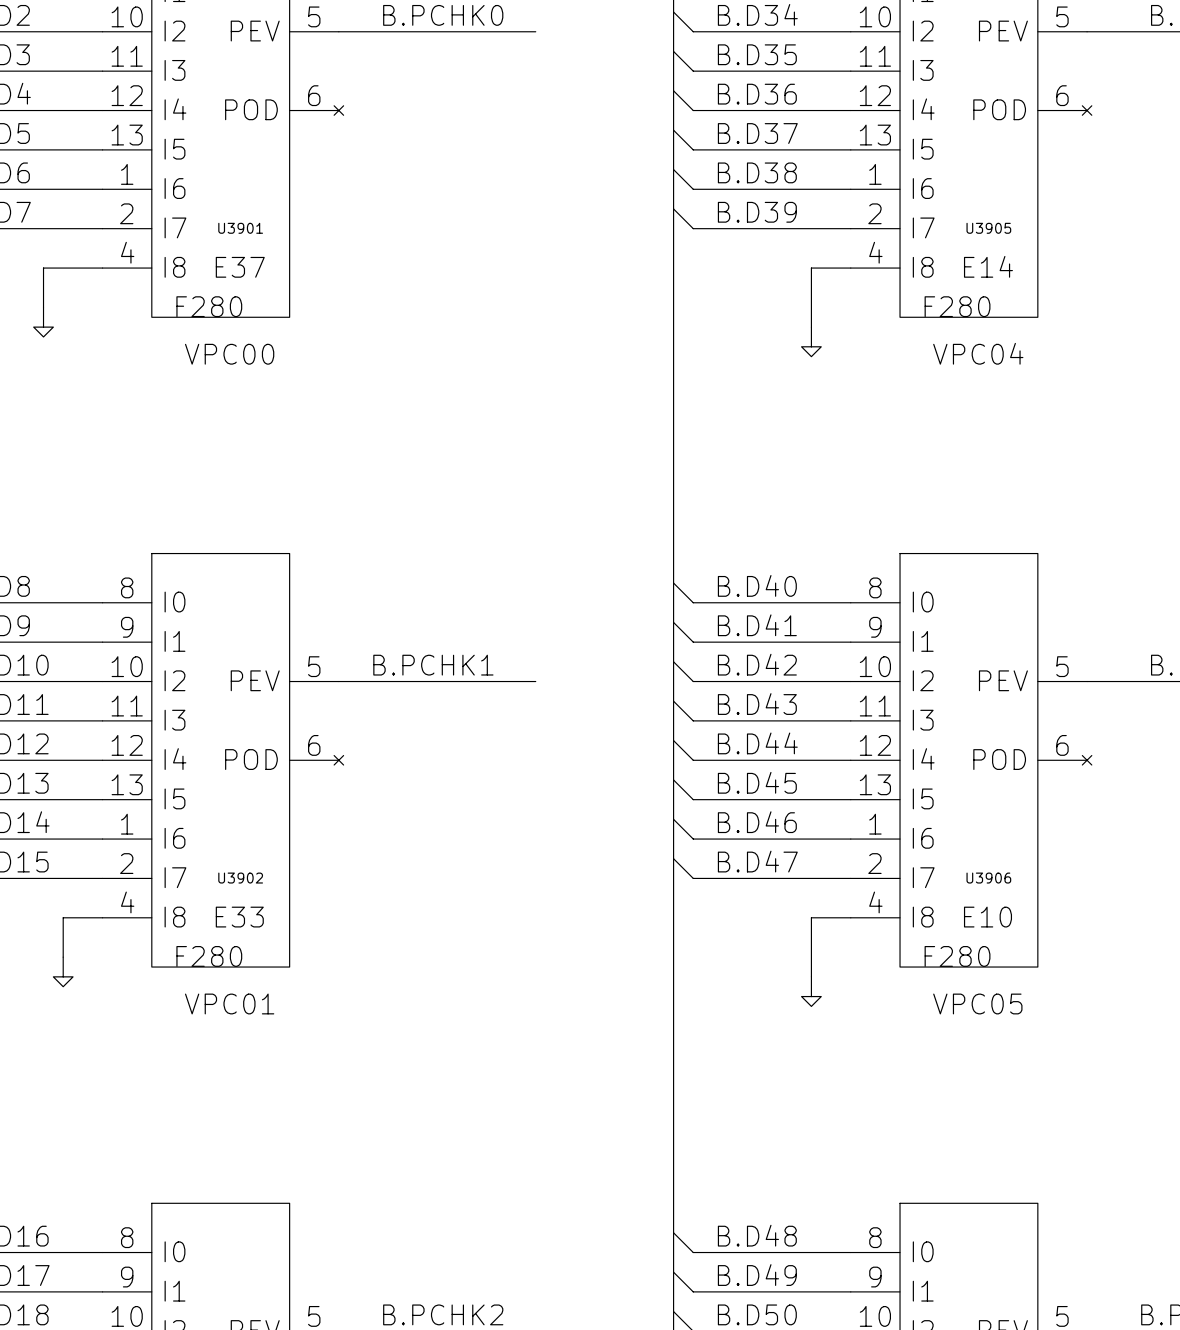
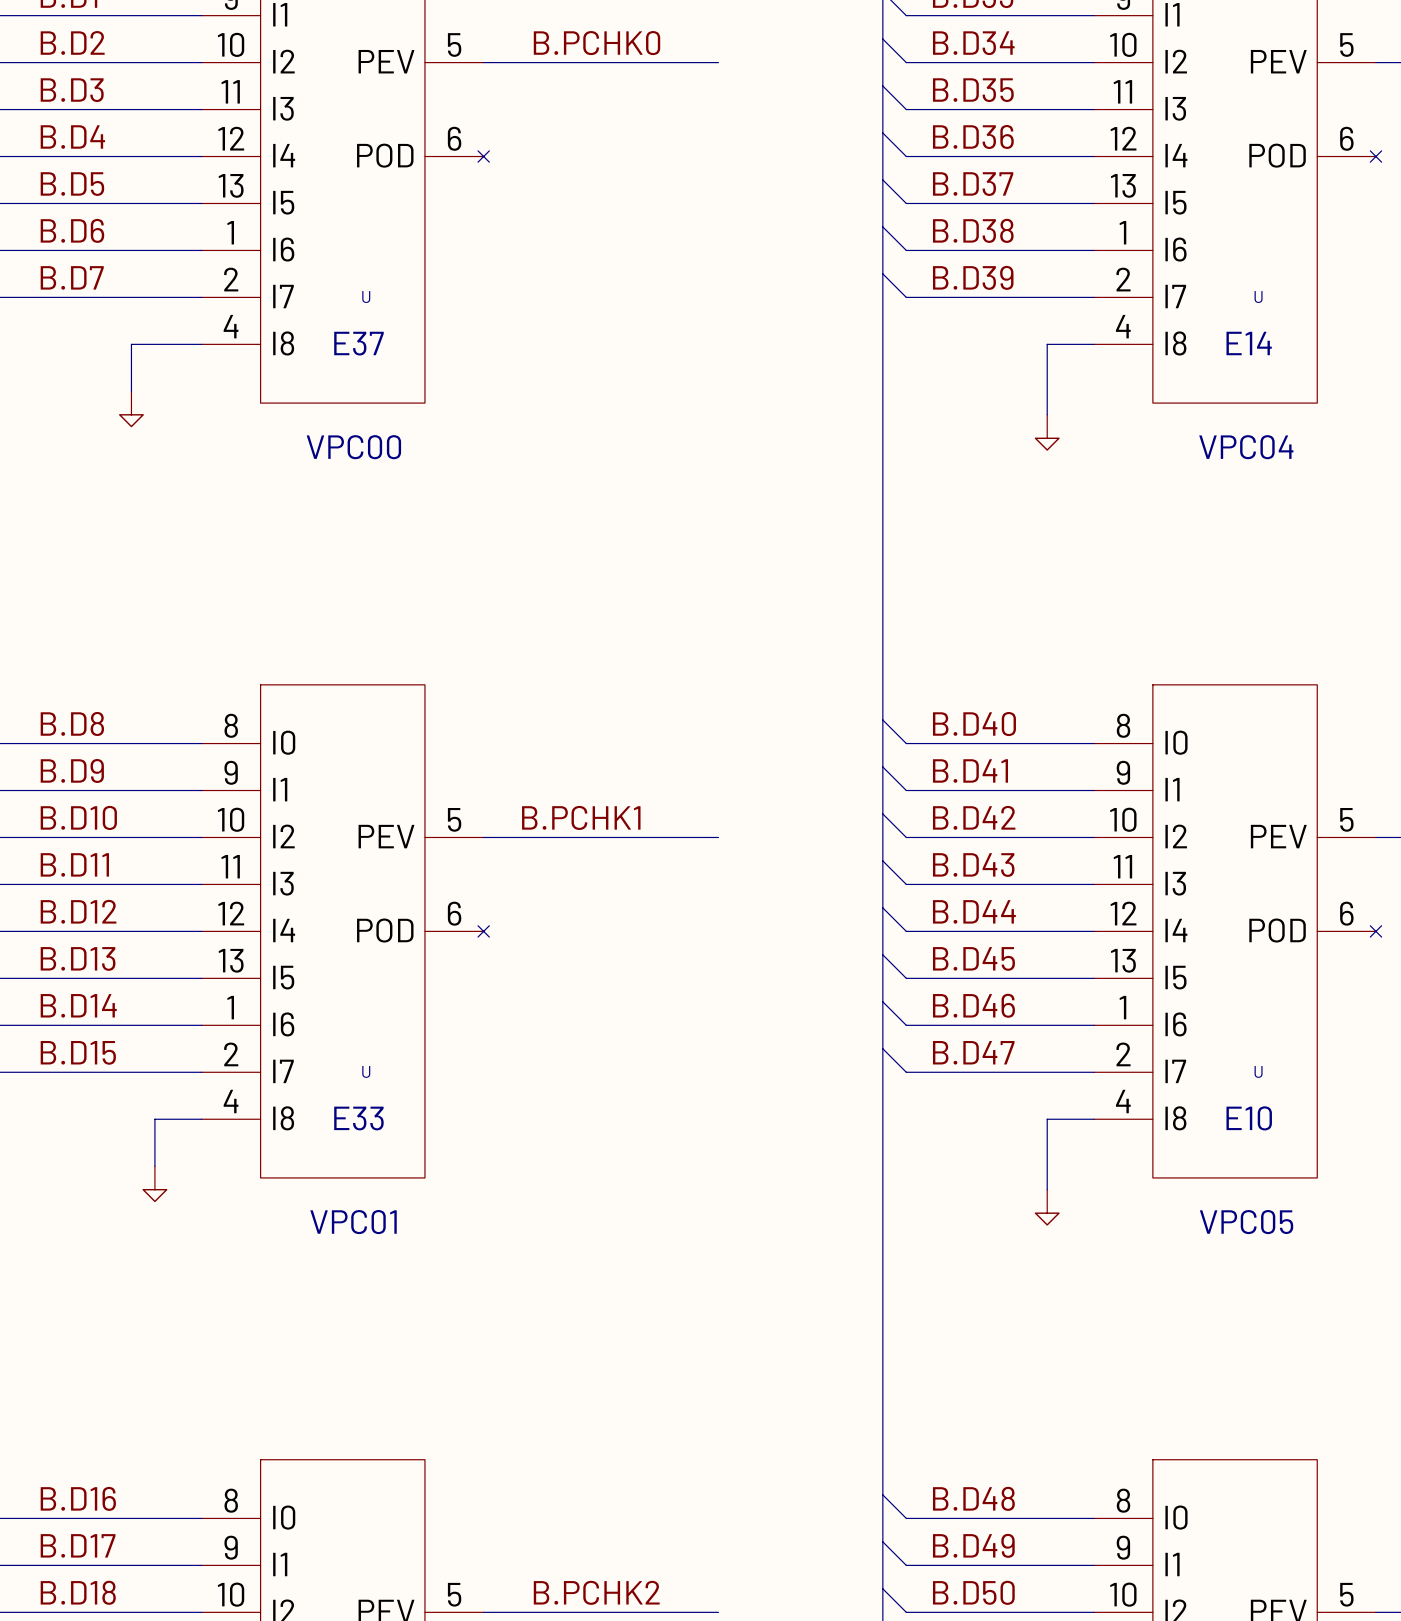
U3901 name: U3901 (240, 228) -> U (366, 297)
U3905 name: U3905 (988, 228) -> U (1258, 297)
U3901 value: F280 (209, 306) -> none
U3905 value: F280 (957, 306) -> none
U3902 name: U3902 (240, 878) -> U (366, 1071)
U3906 name: U3906 (988, 878) -> U (1258, 1071)
U3902 value: F280 (209, 956) -> none
U3906 value: F280 (957, 956) -> none

